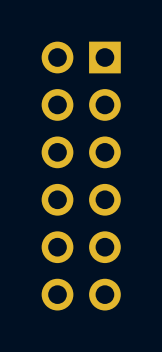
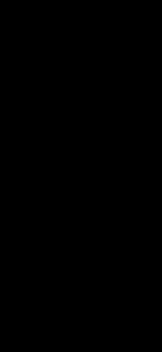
part: (81, 176) -> none

